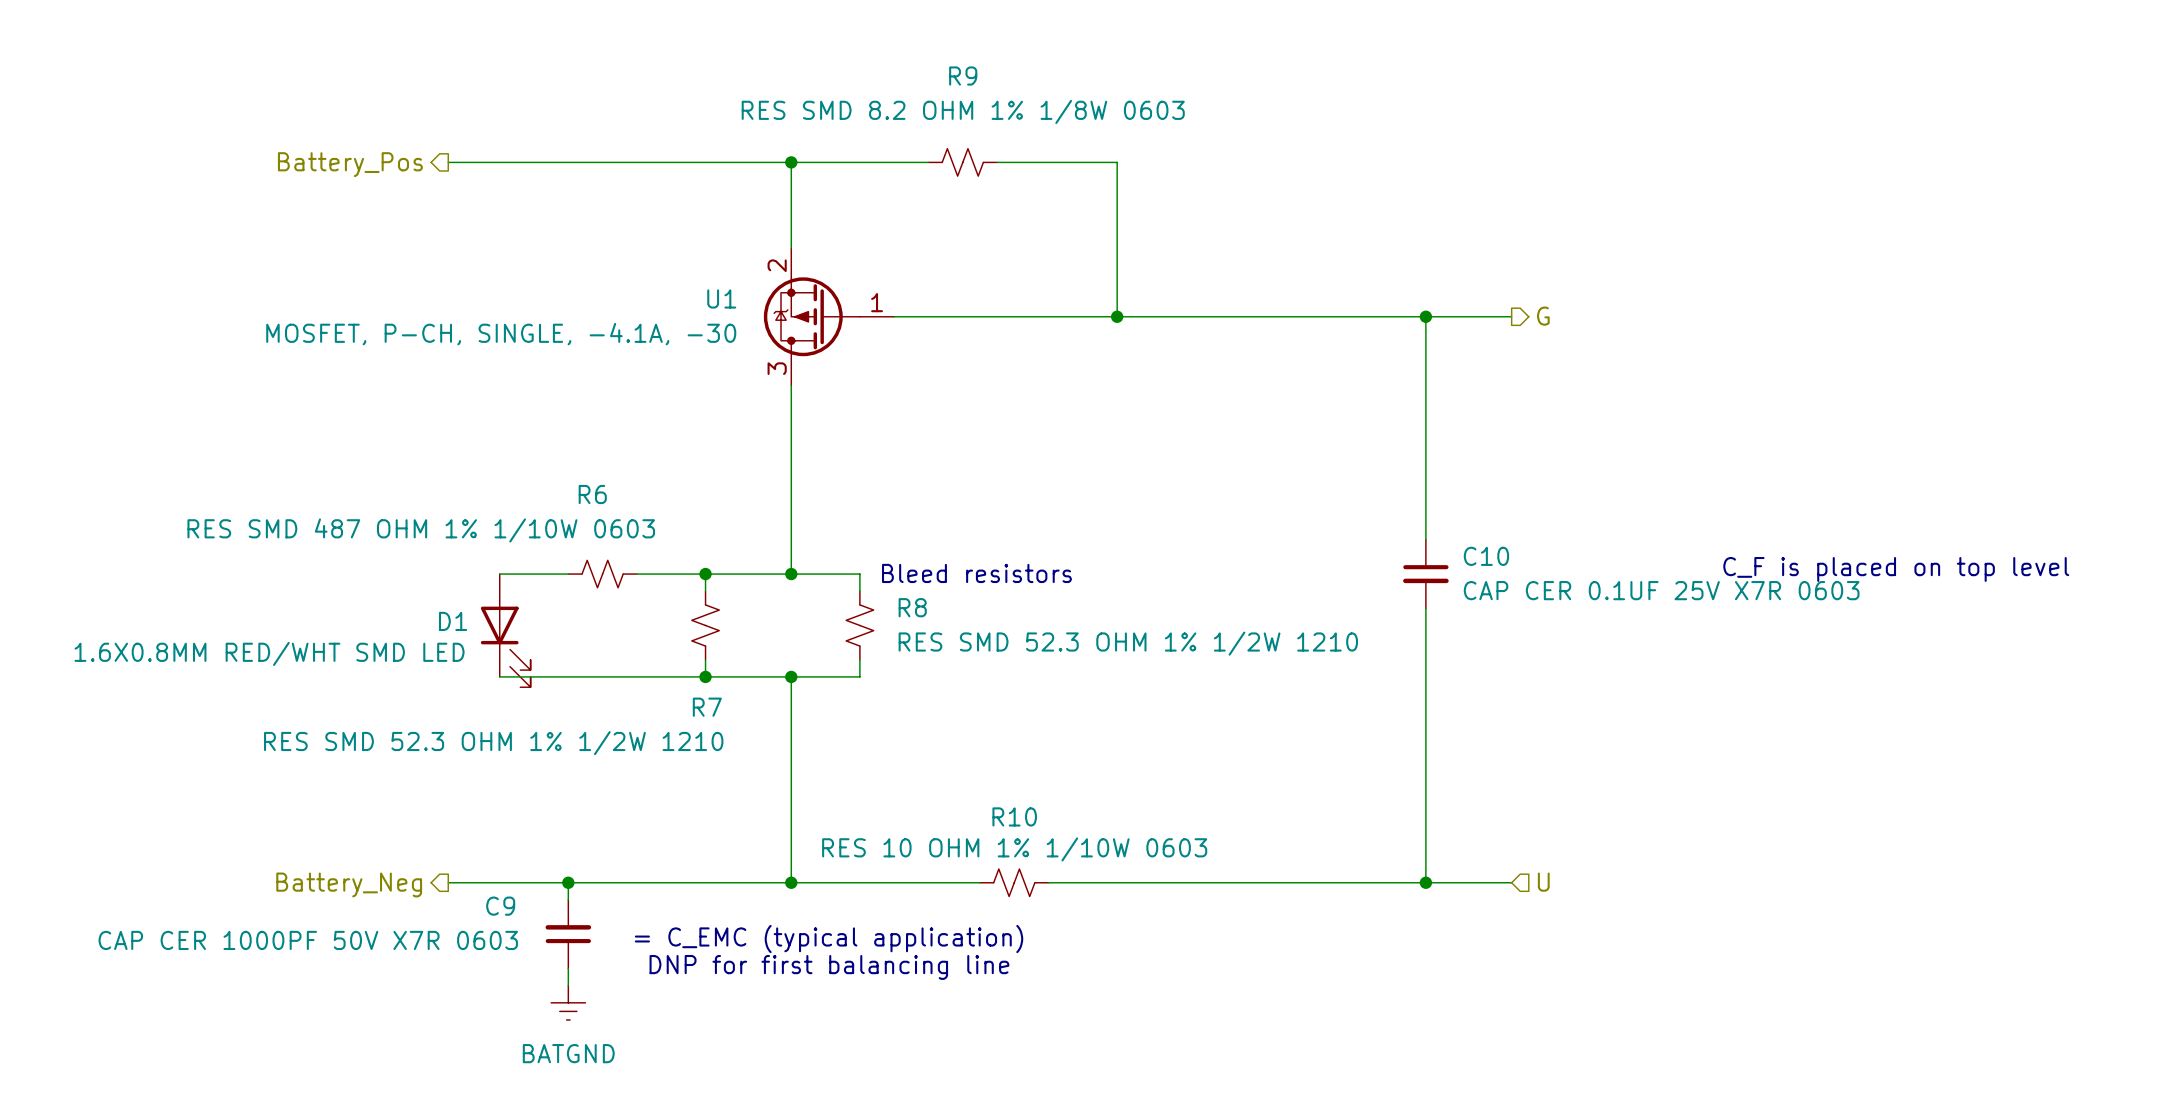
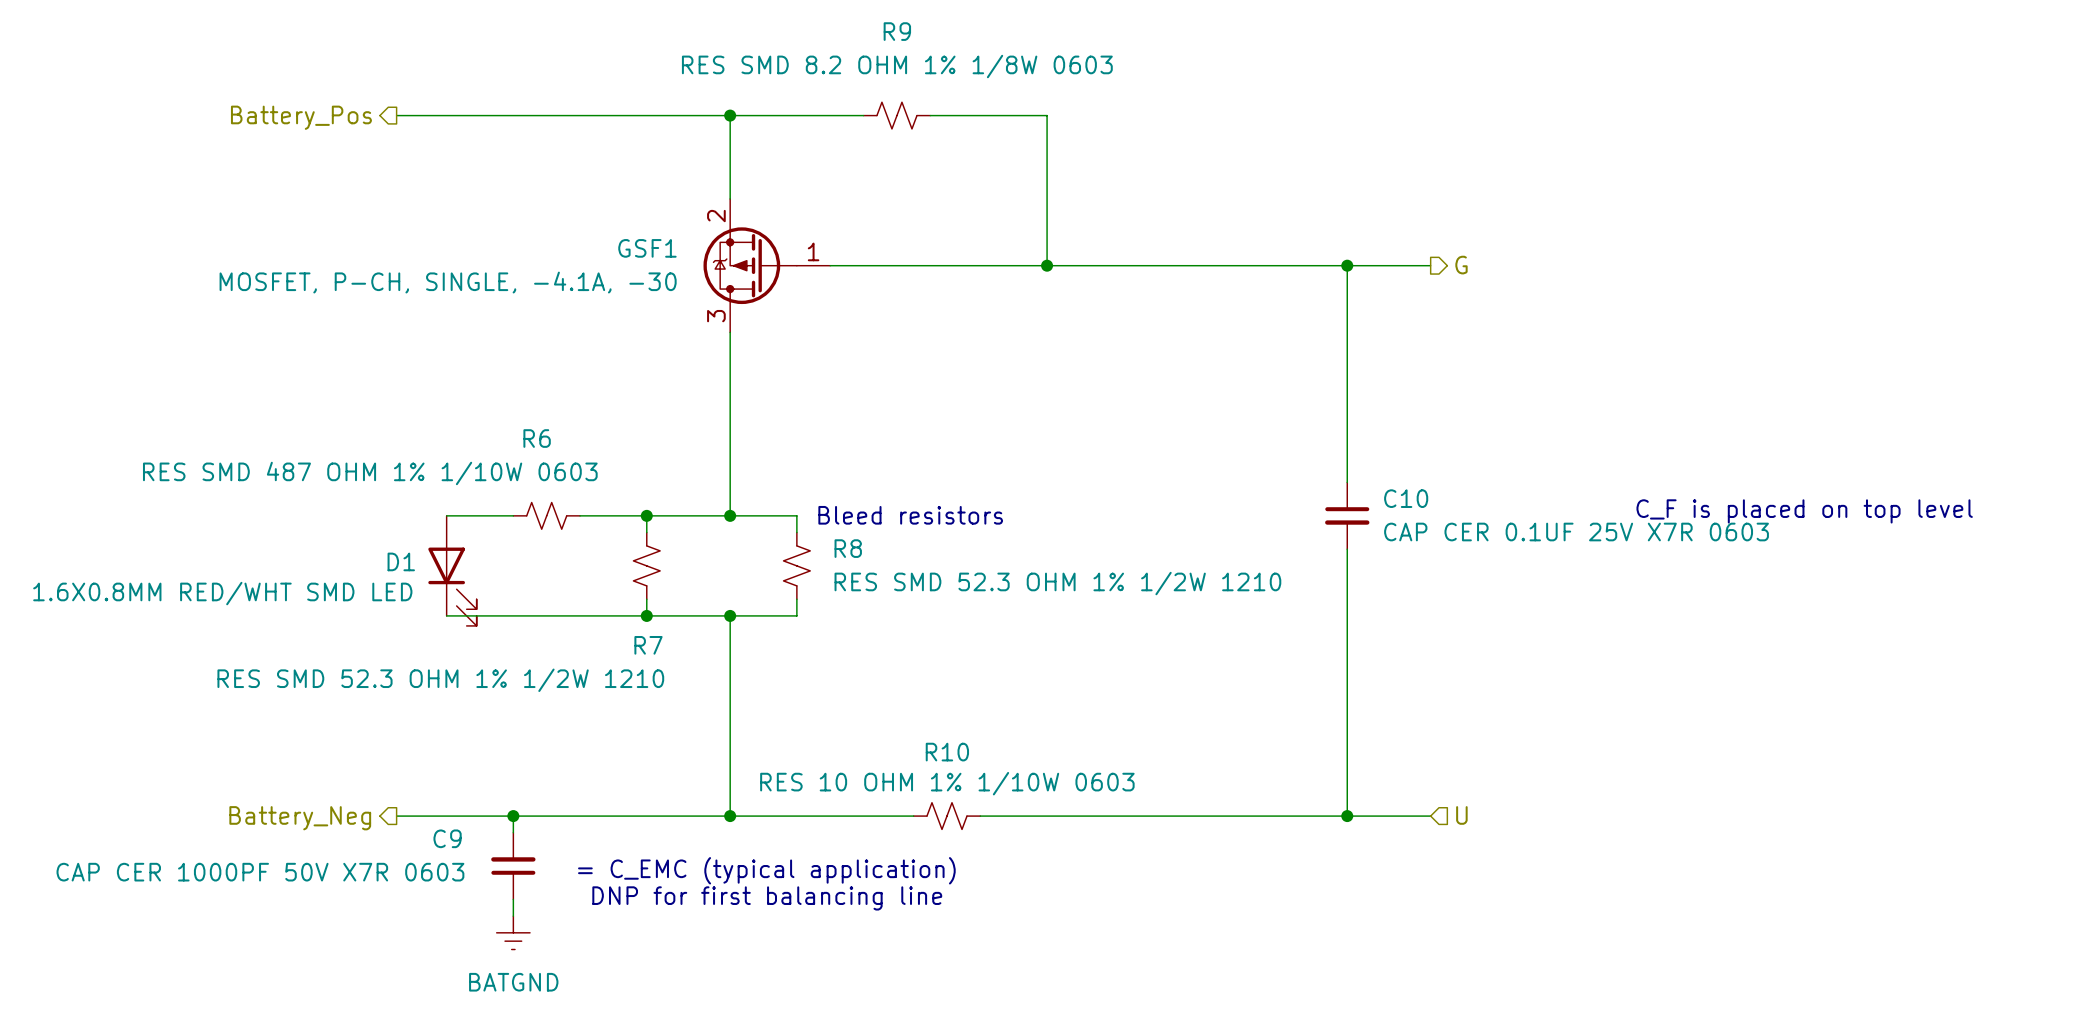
U1 name: U1 (721, 298) -> GSF1 (647, 248)

